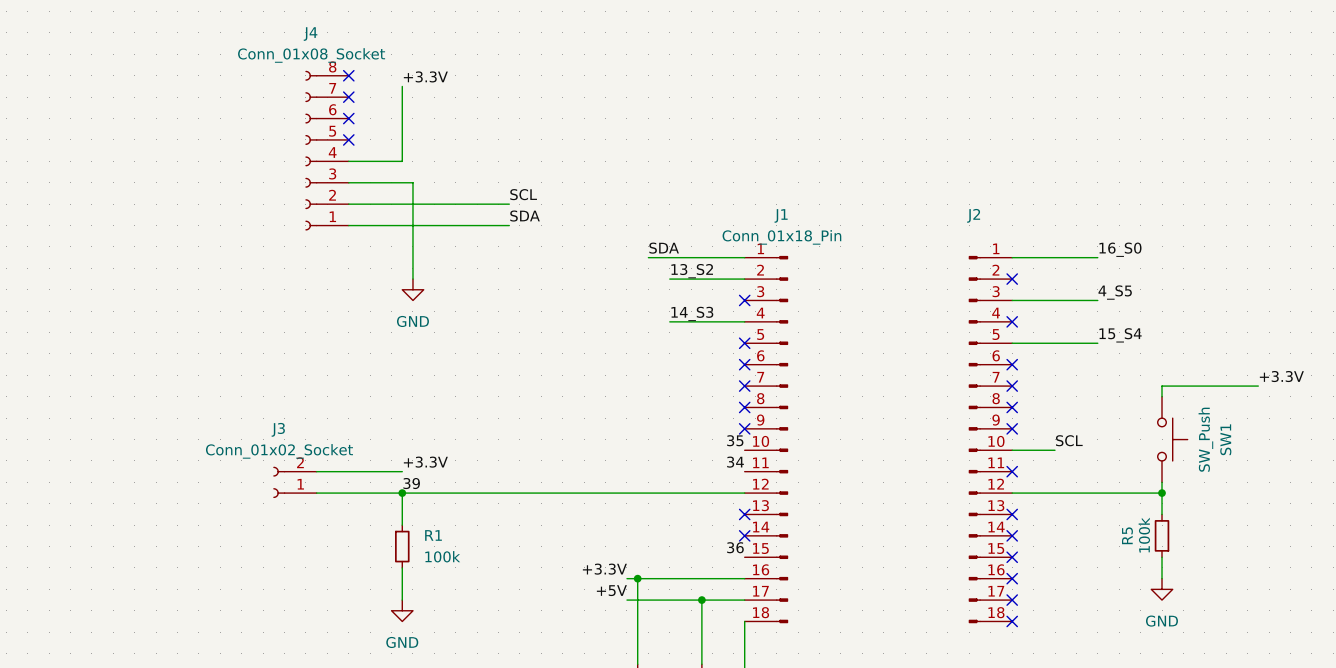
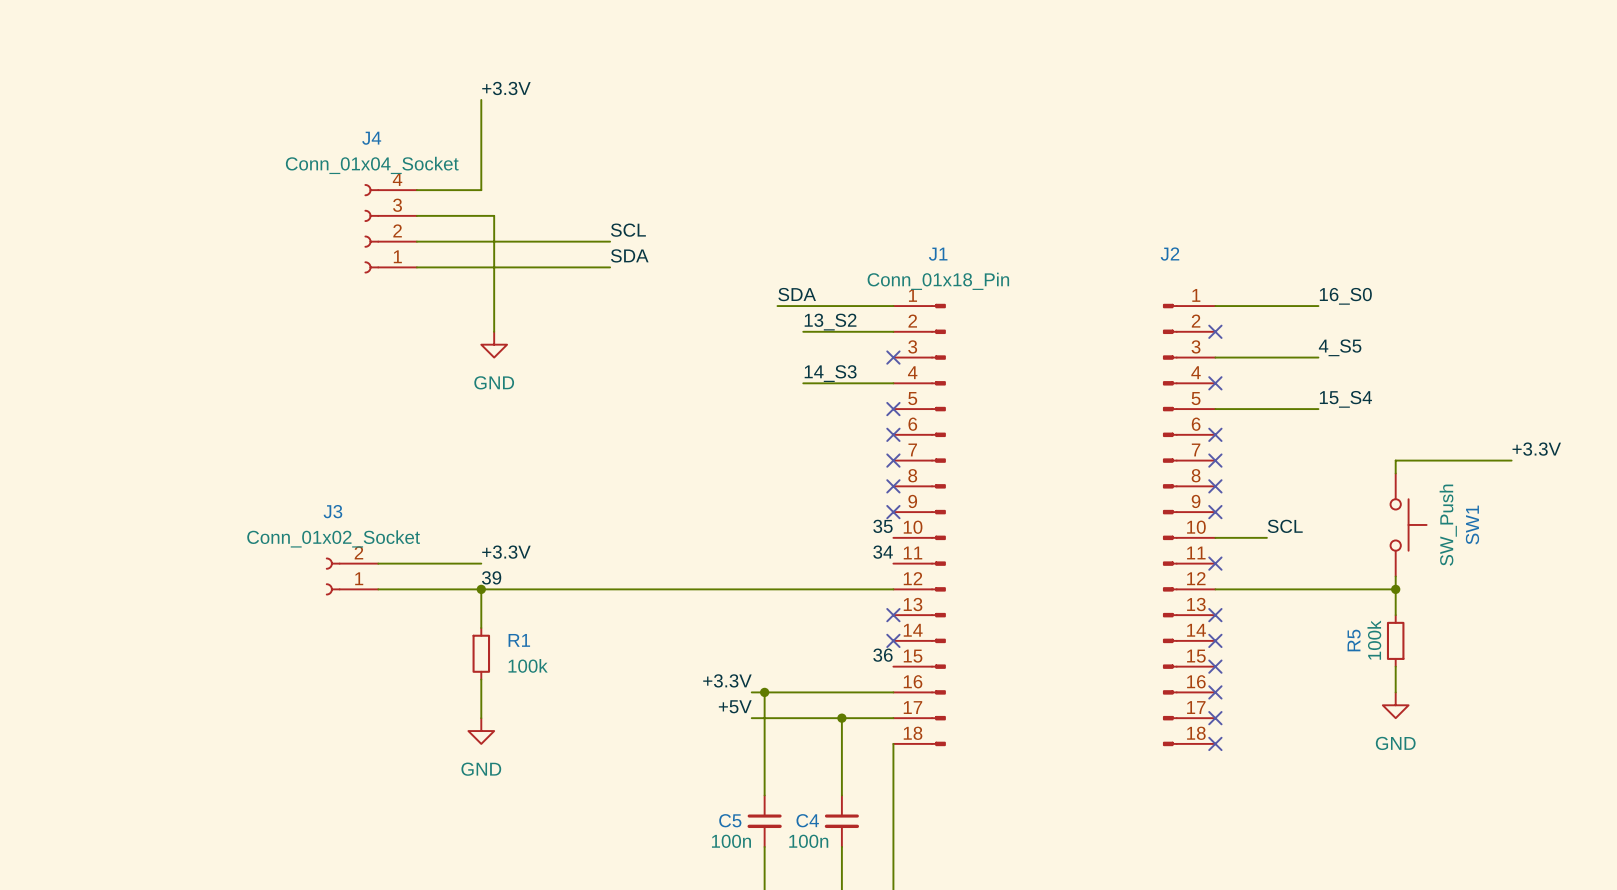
J4 name position: J4 (310, 34) -> J4 (371, 138)
J4 value: Conn_01x08_Socket (311, 55) -> Conn_01x04_Socket (372, 165)
J4 symbol: [305, 70, 349, 231] -> [364, 184, 417, 274]
no-connect mark: (348, 75) -> none
no-connect mark: (348, 97) -> none
no-connect mark: (348, 118) -> none
no-connect mark: (348, 139) -> none

